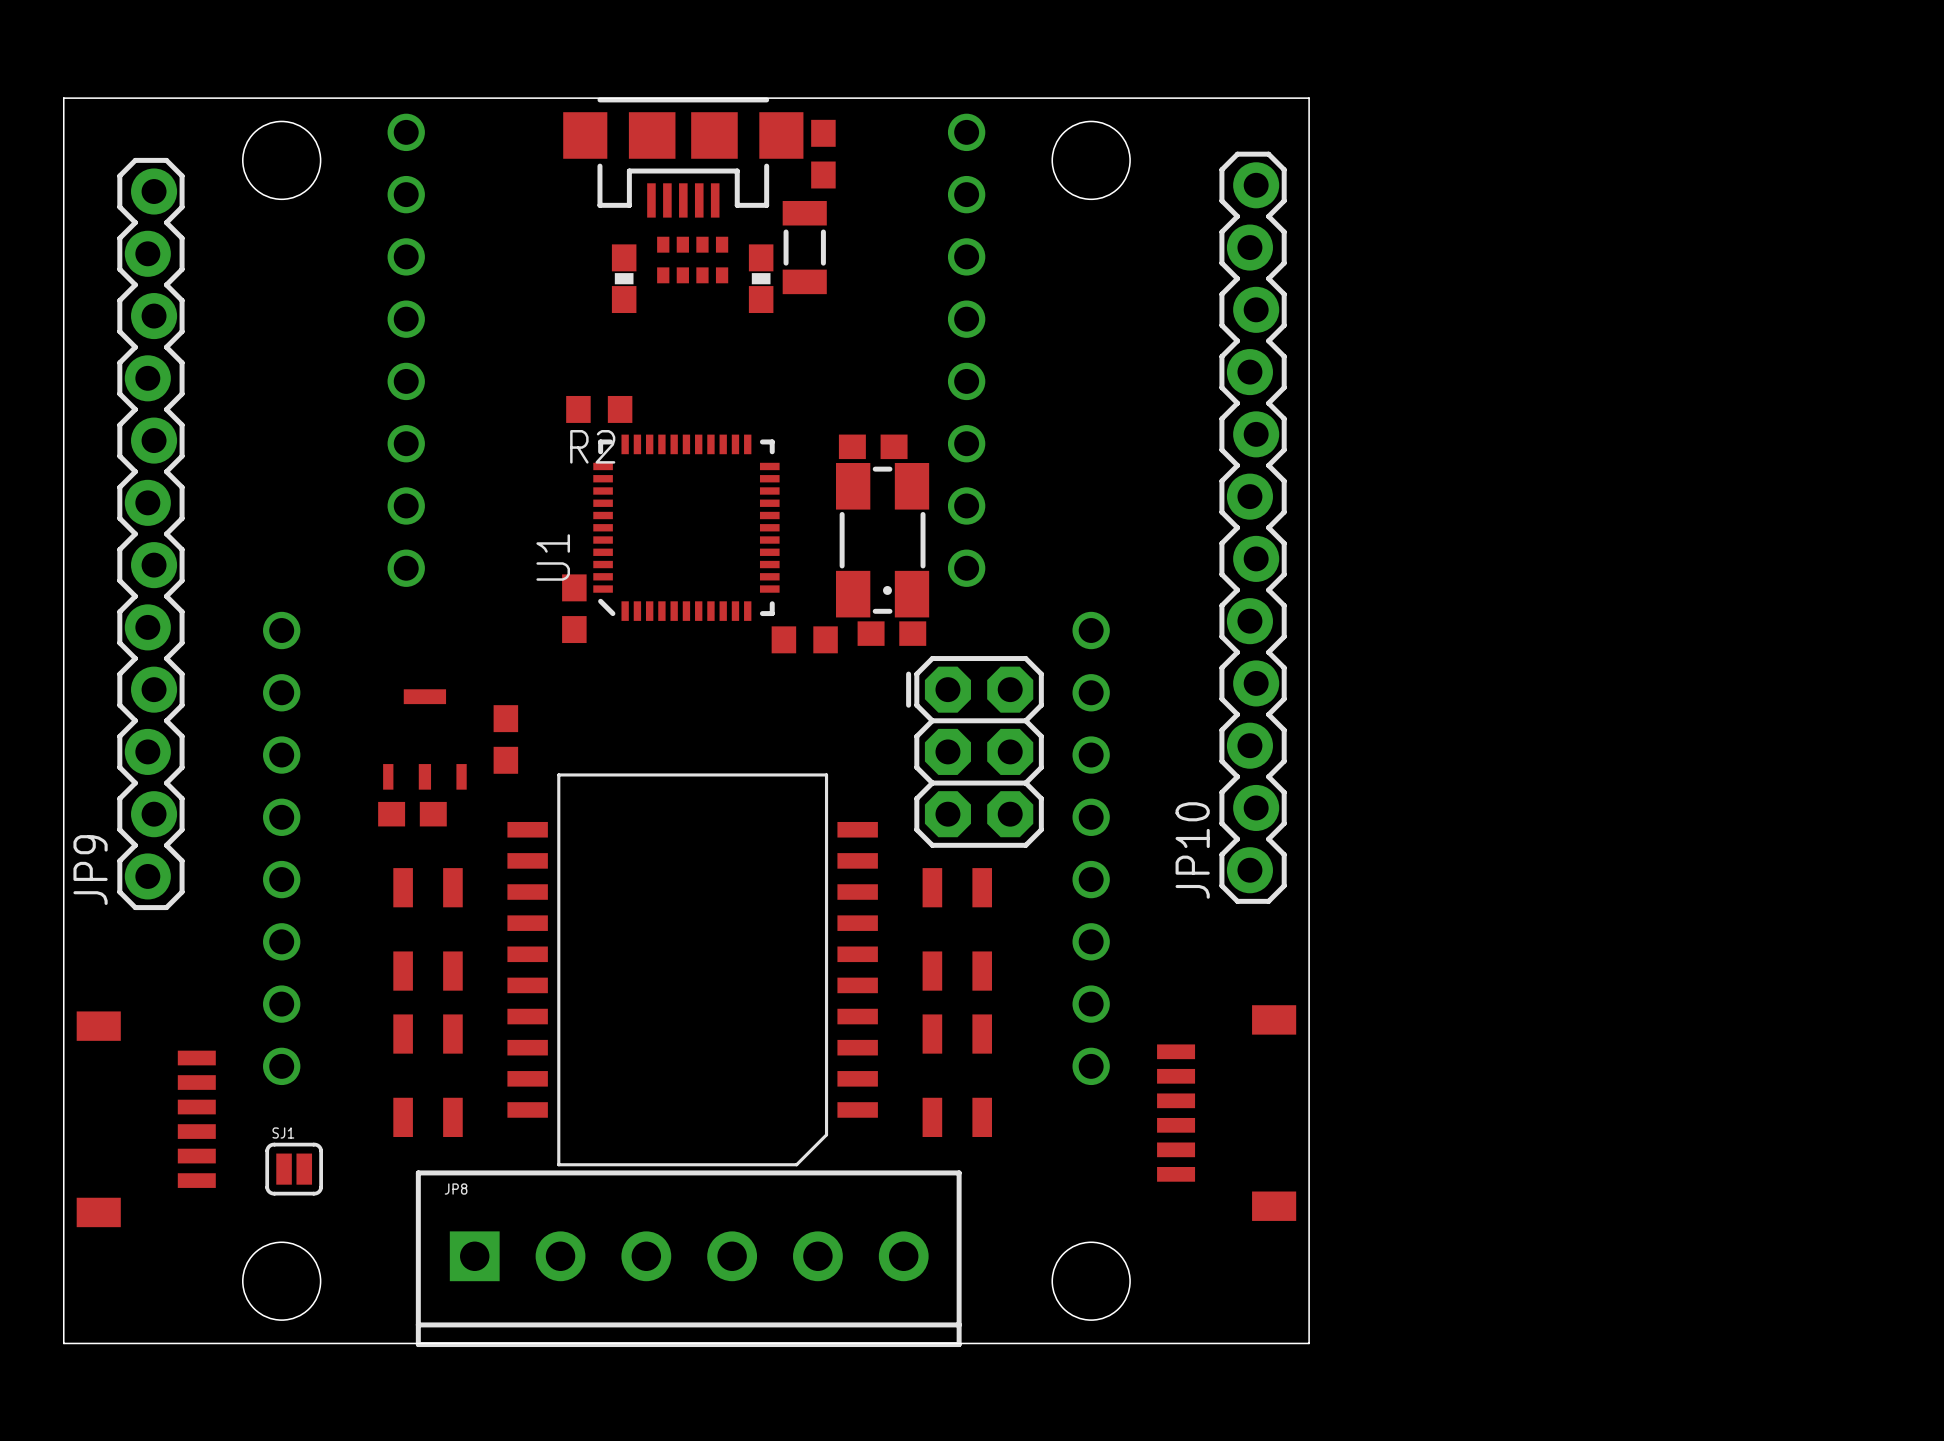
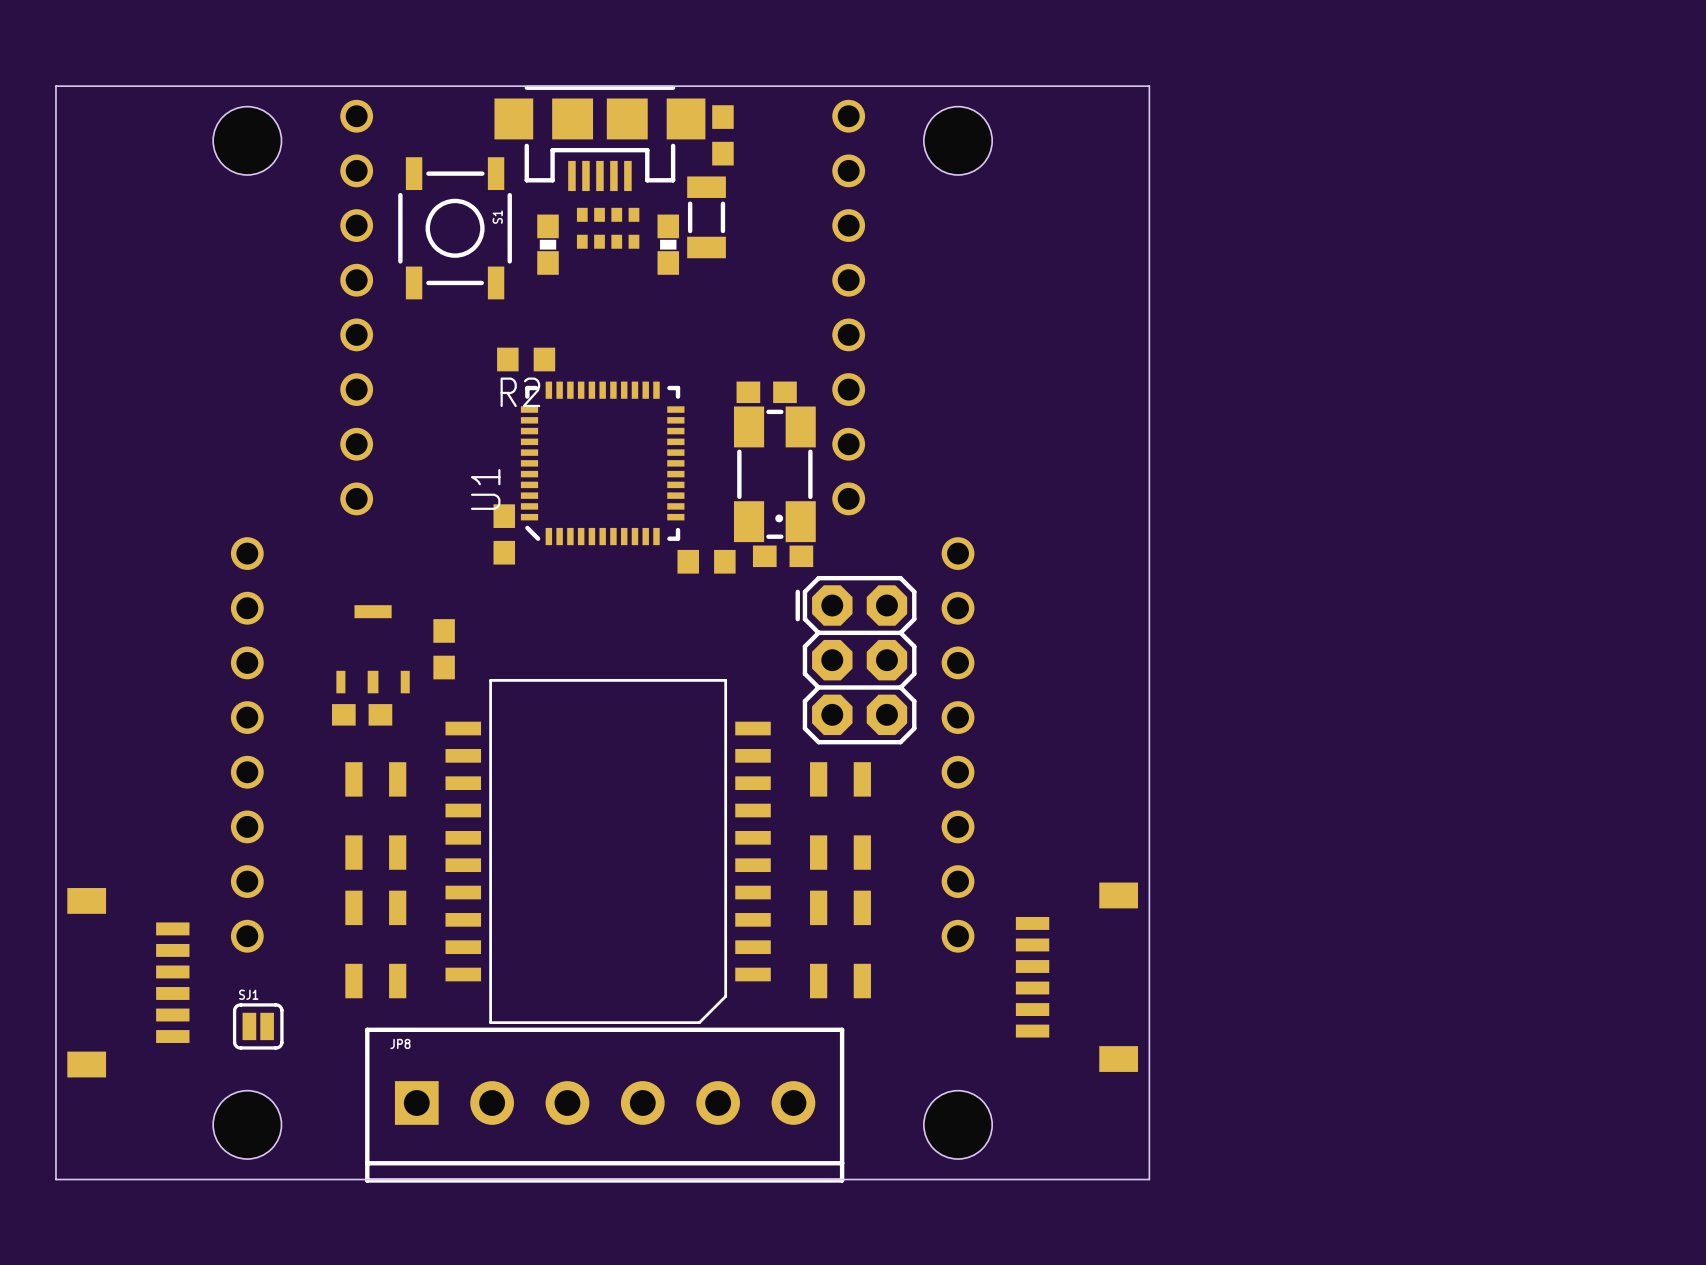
S1: none -> (455, 228)
JP10: (1253, 527) -> none
JP9: (150, 533) -> none

